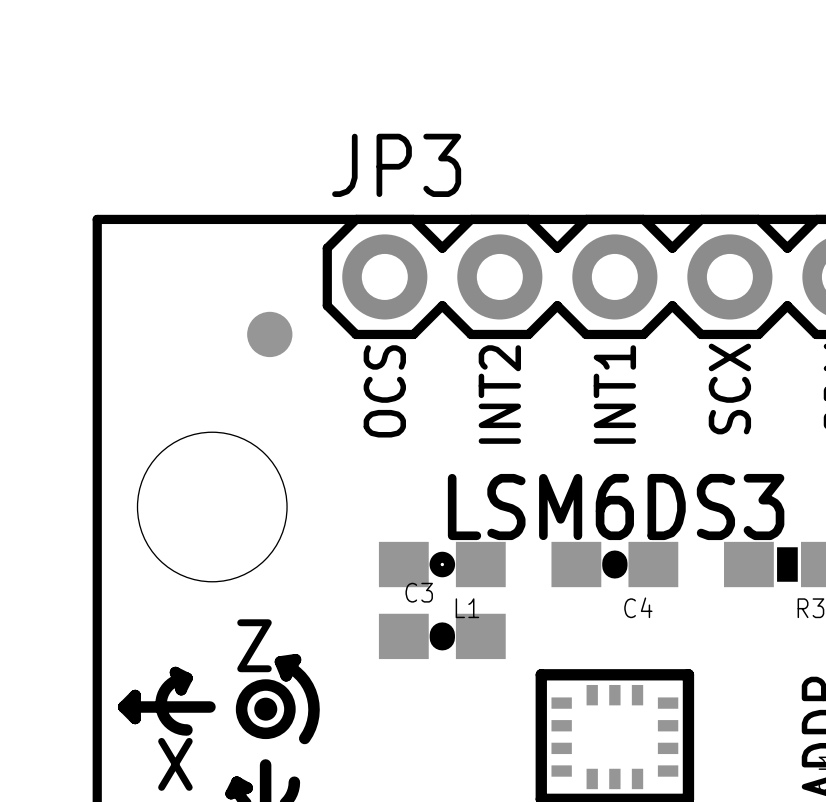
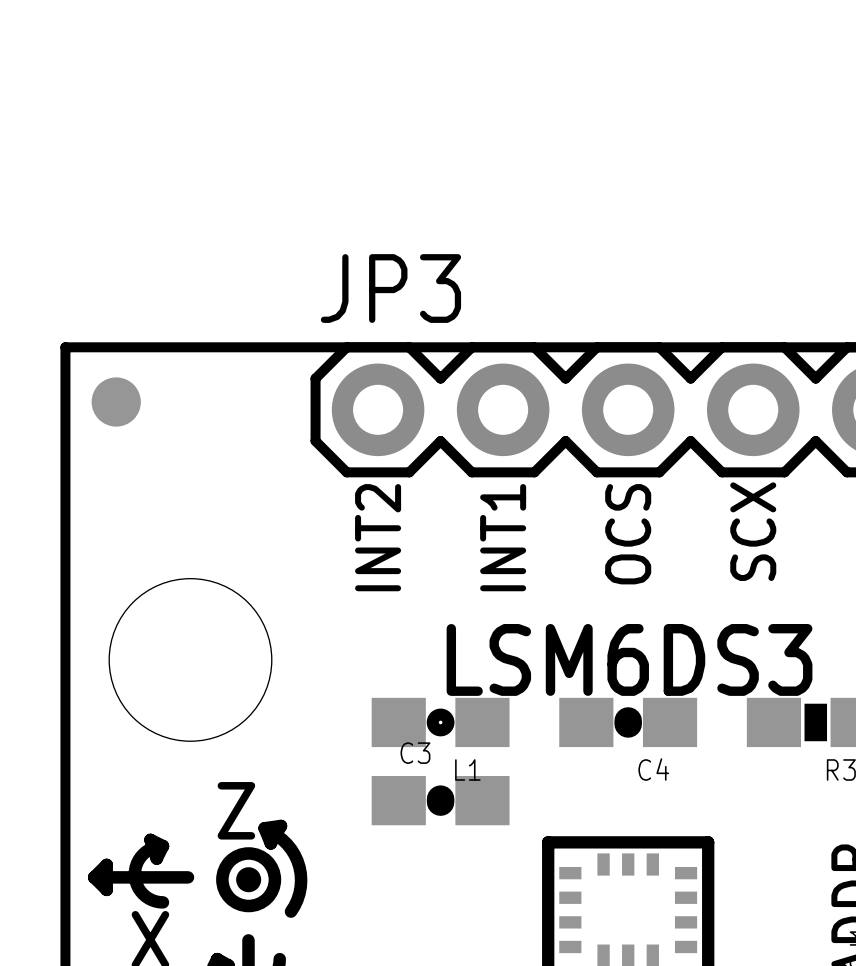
part position: (269, 334) -> (116, 402)
text: OCS (384, 391) -> INT2 (378, 537)
text: INT2 (499, 394) -> INT1 (503, 537)
text: INT1 (614, 394) -> OCS (628, 534)

